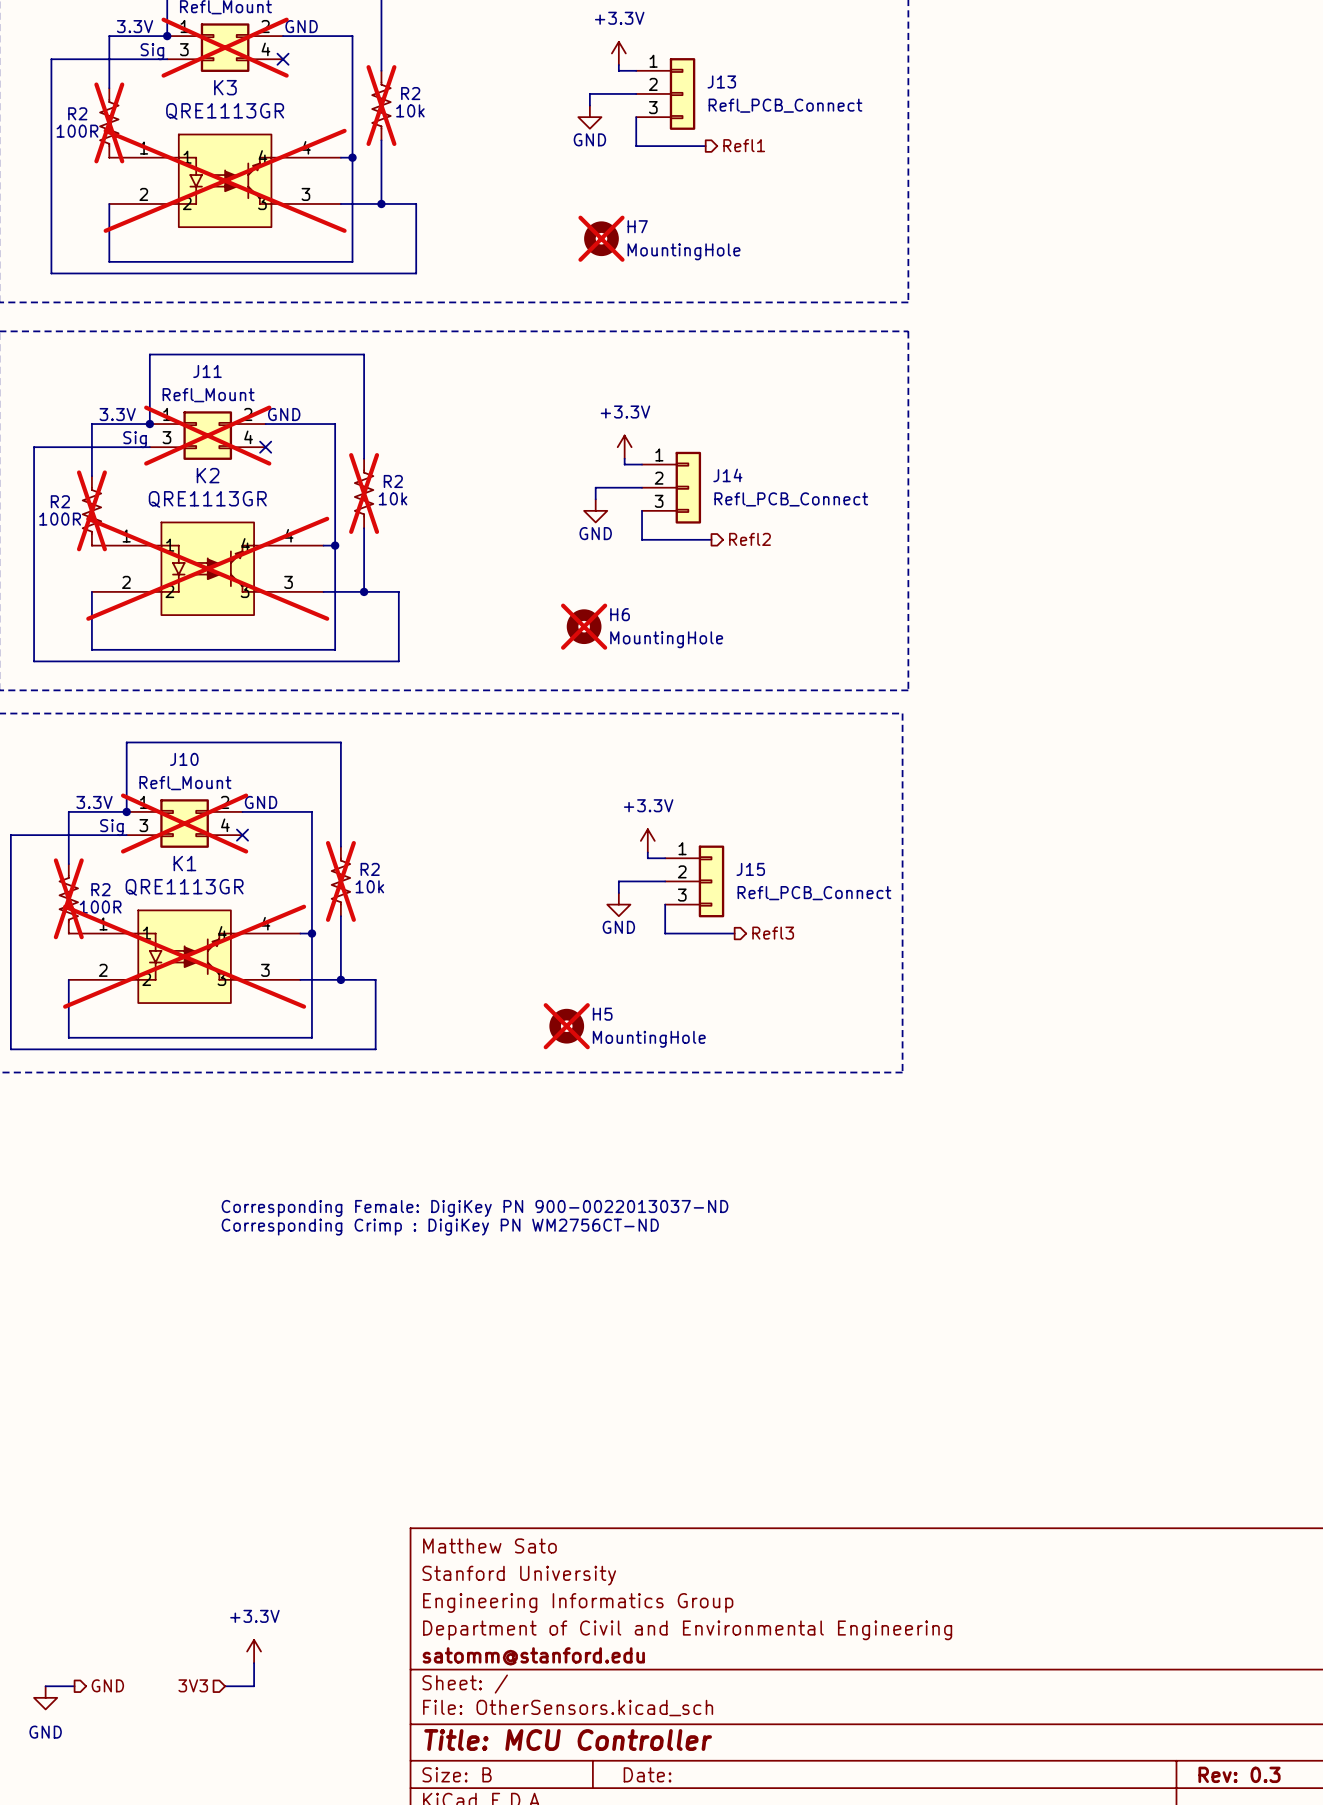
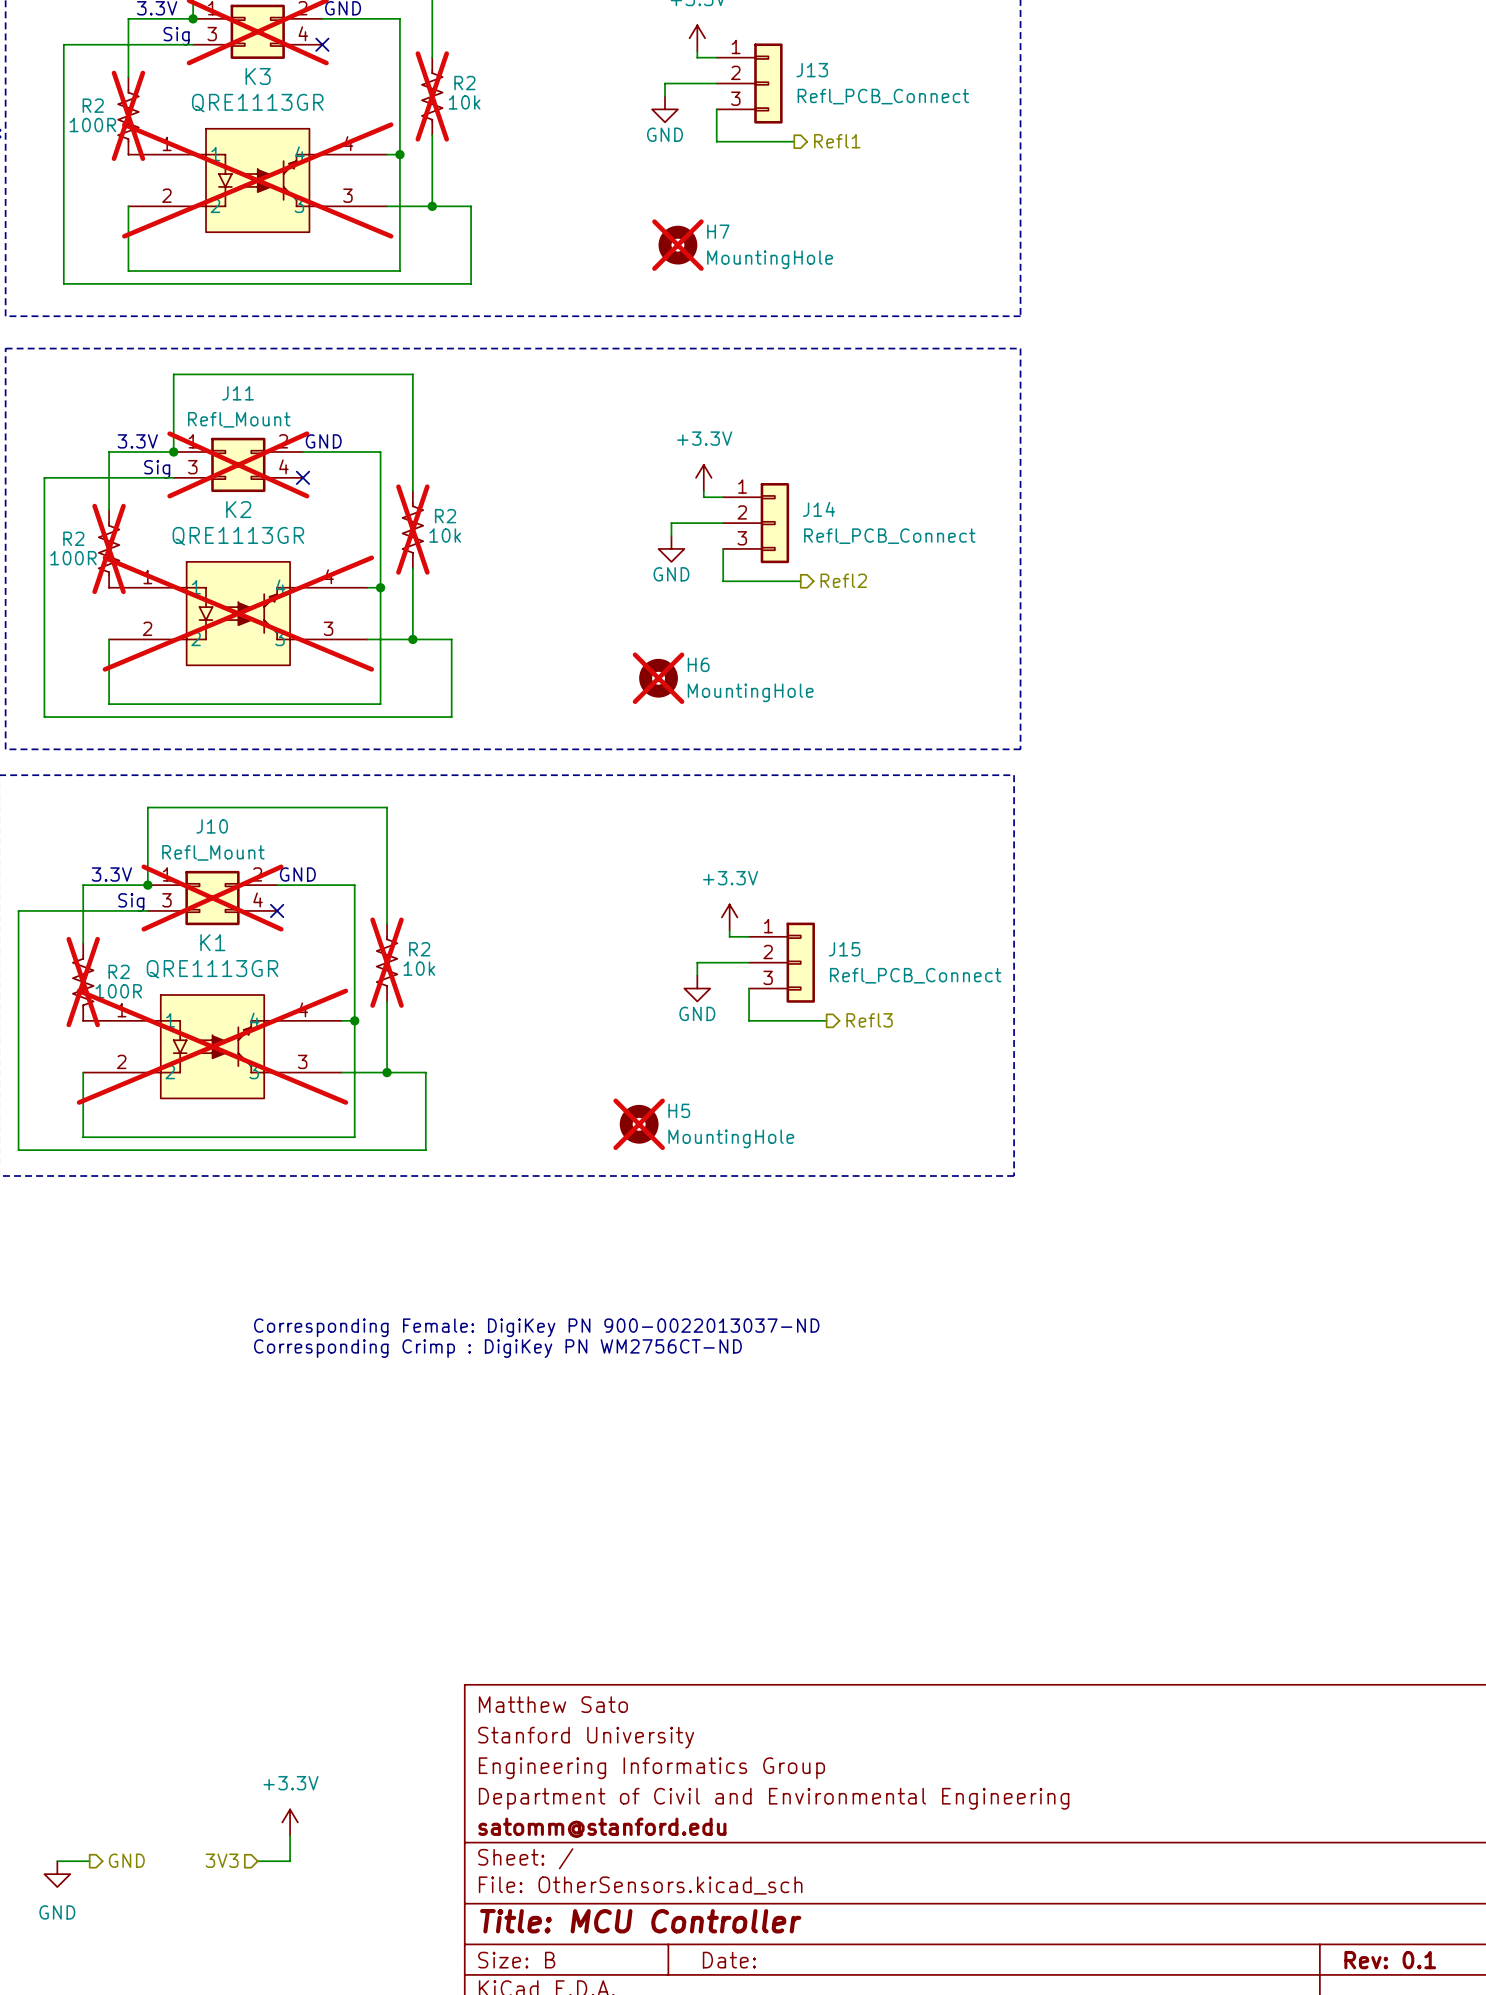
title block: Rev: 0.3 (1239, 1774) -> Rev: 0.1 (1390, 1960)

